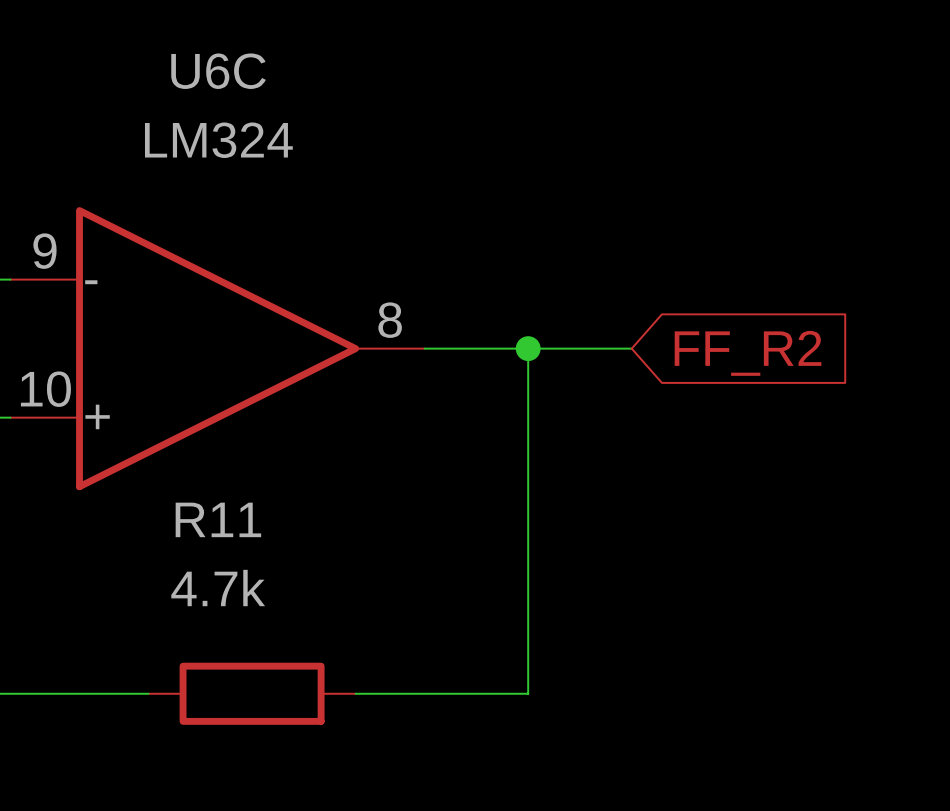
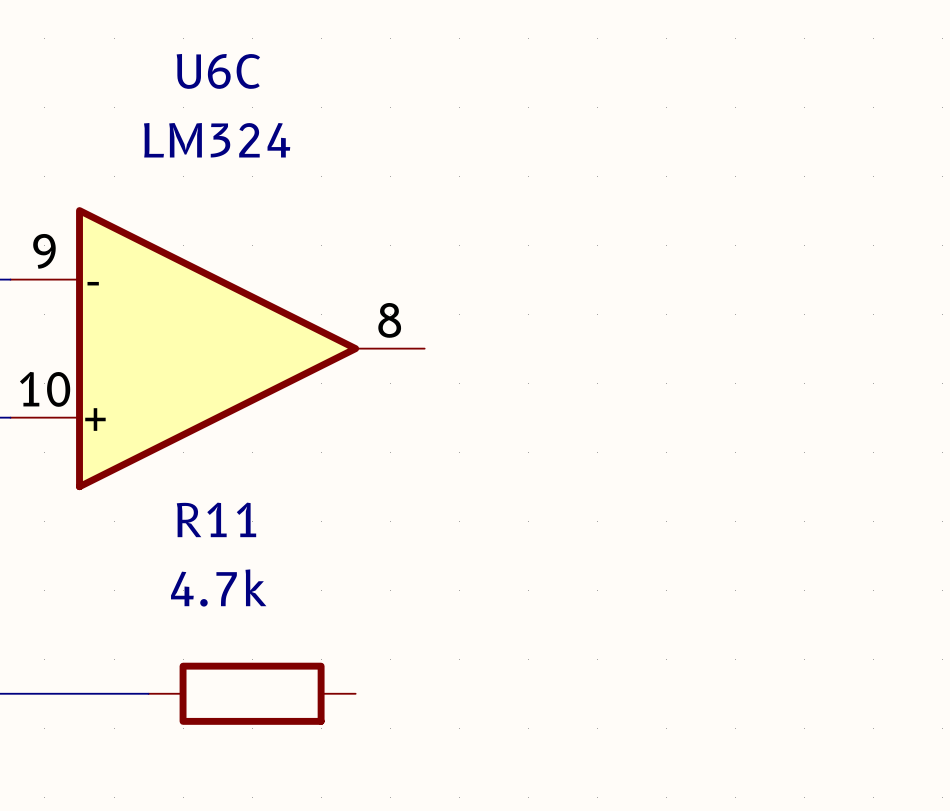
wire: (424, 348) (631, 348) -> none
wire: (528, 348) (528, 693) (355, 693) -> none
junction: (528, 348) -> none
global label: FF_R2 (748, 353) -> none

